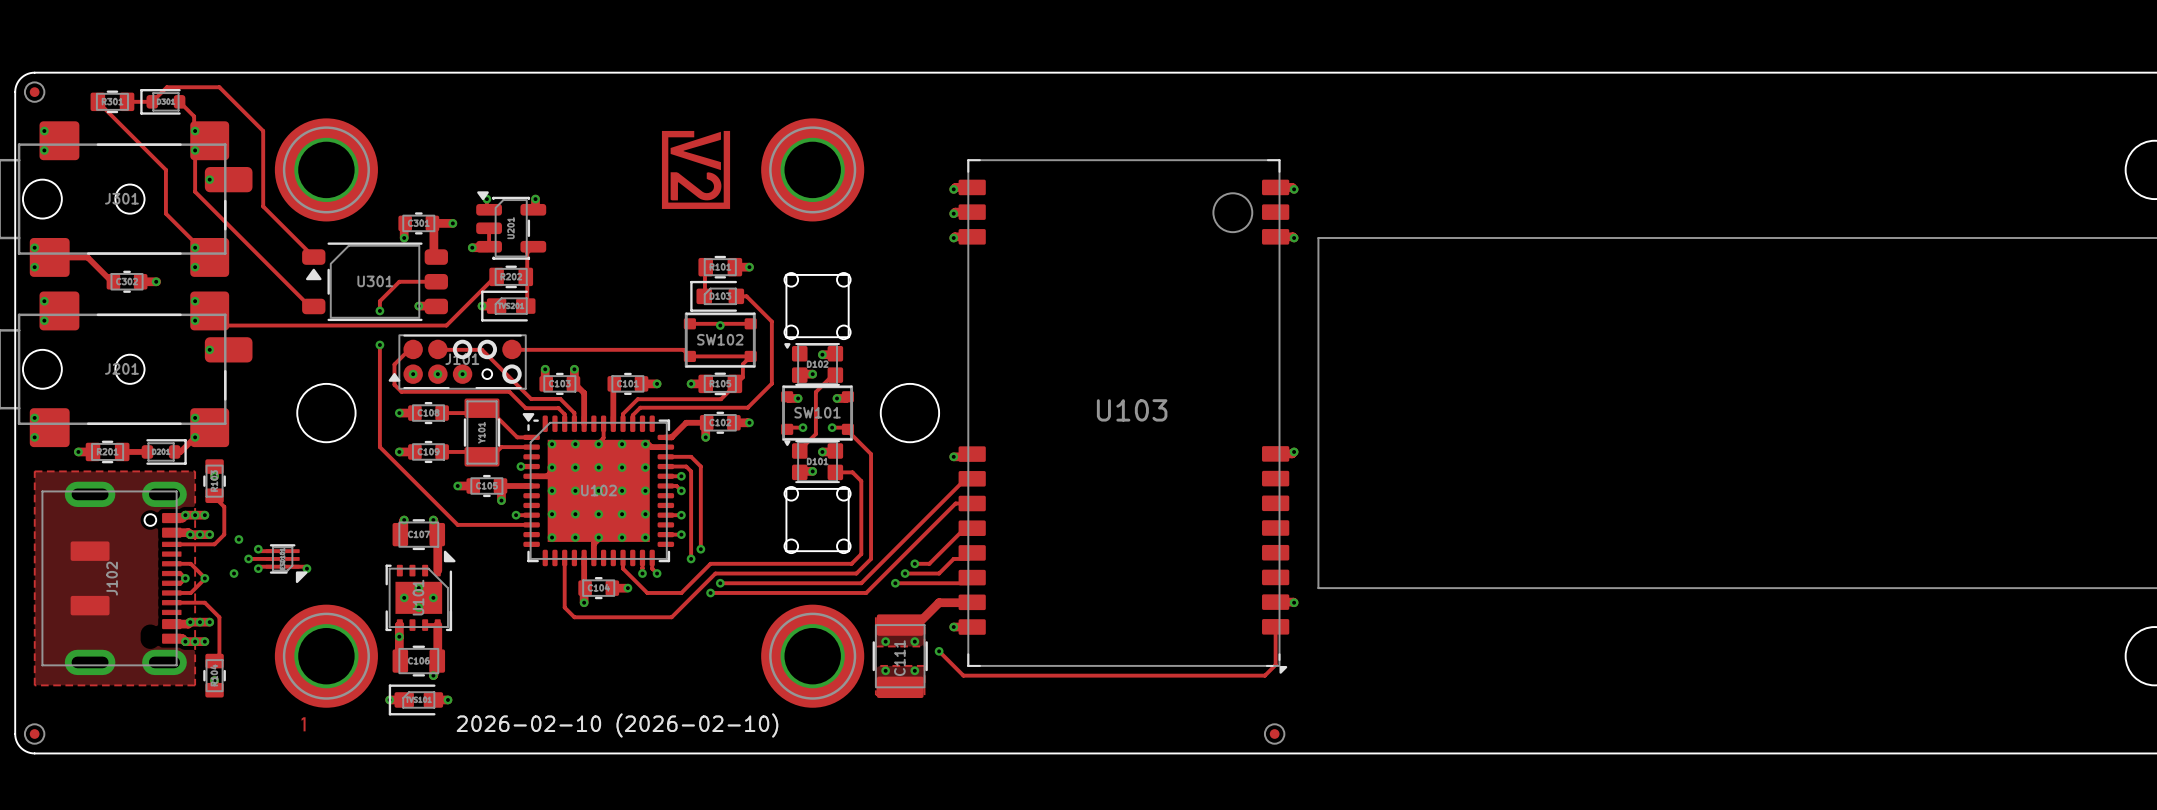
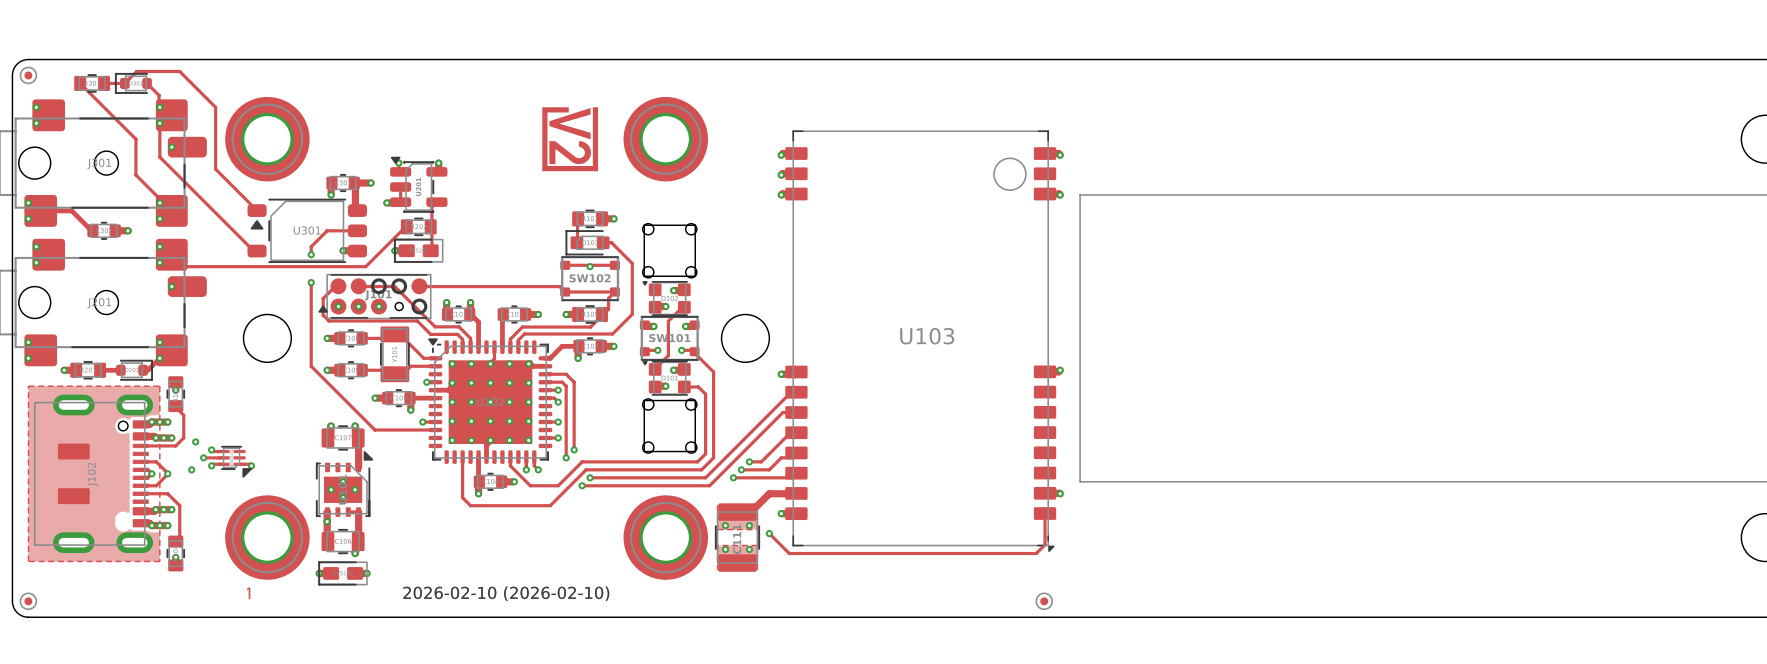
part footprint: [481, 290, 536, 322] -> [393, 238, 444, 263]
part footprint: [388, 684, 444, 716] -> [318, 561, 368, 586]

